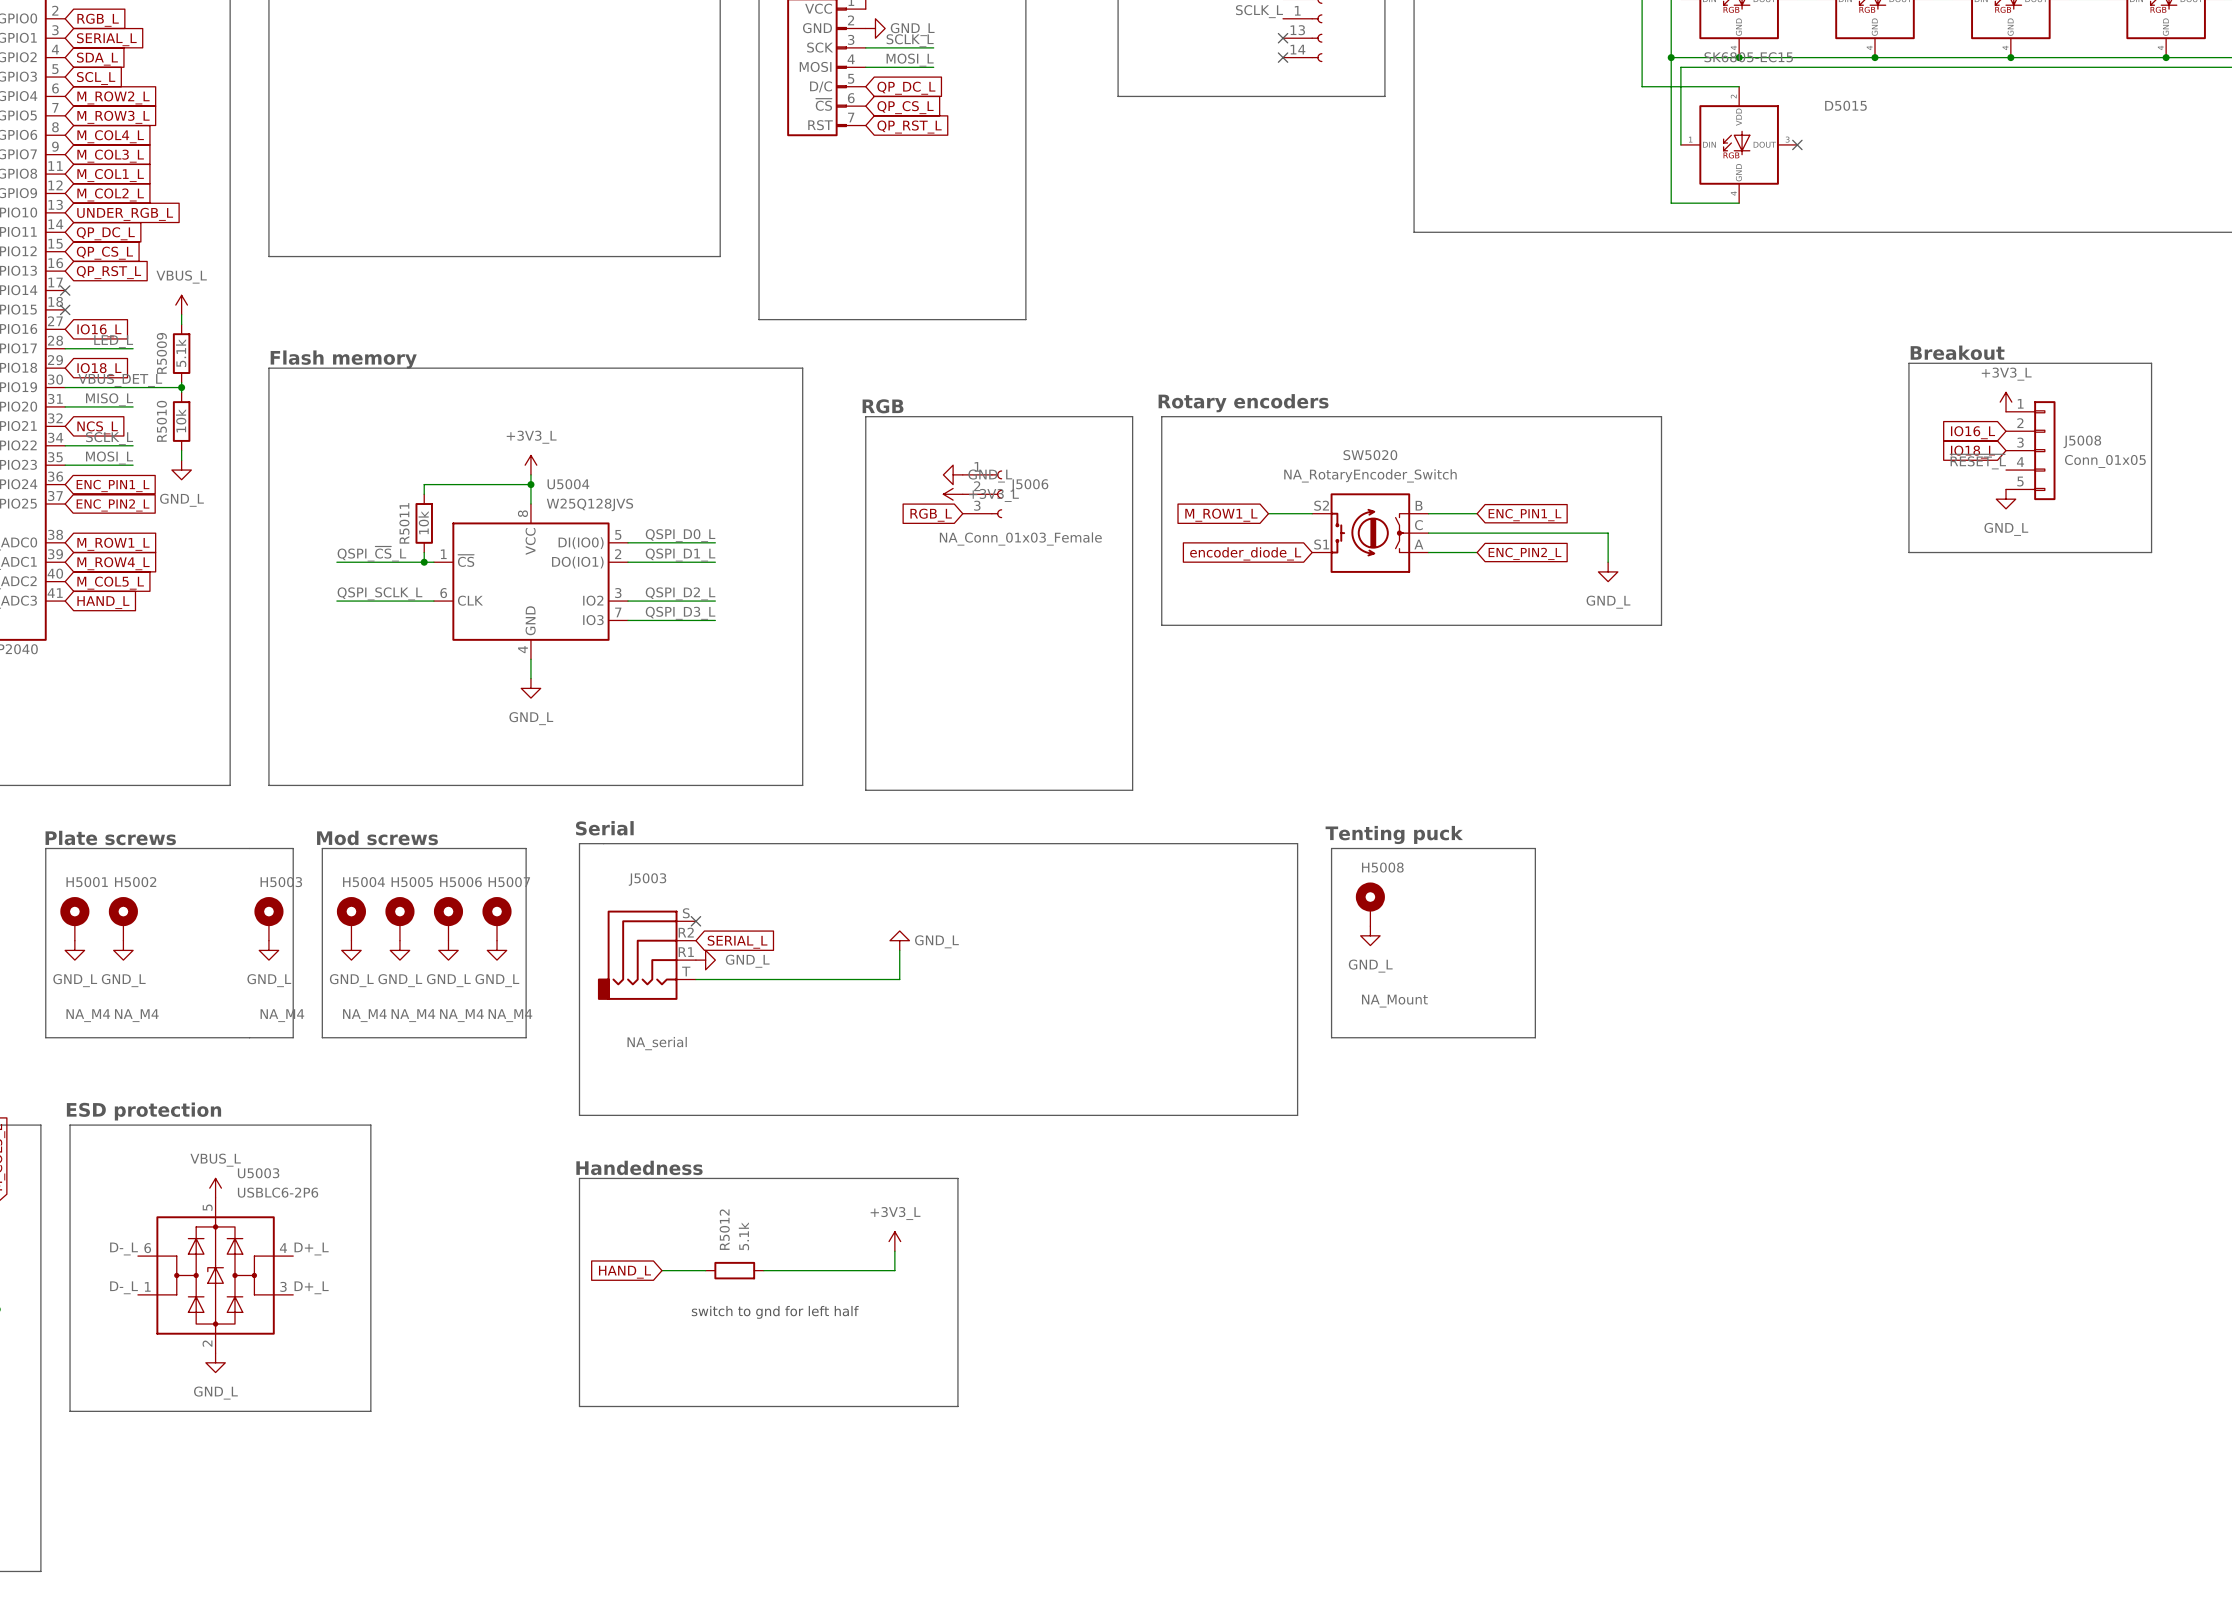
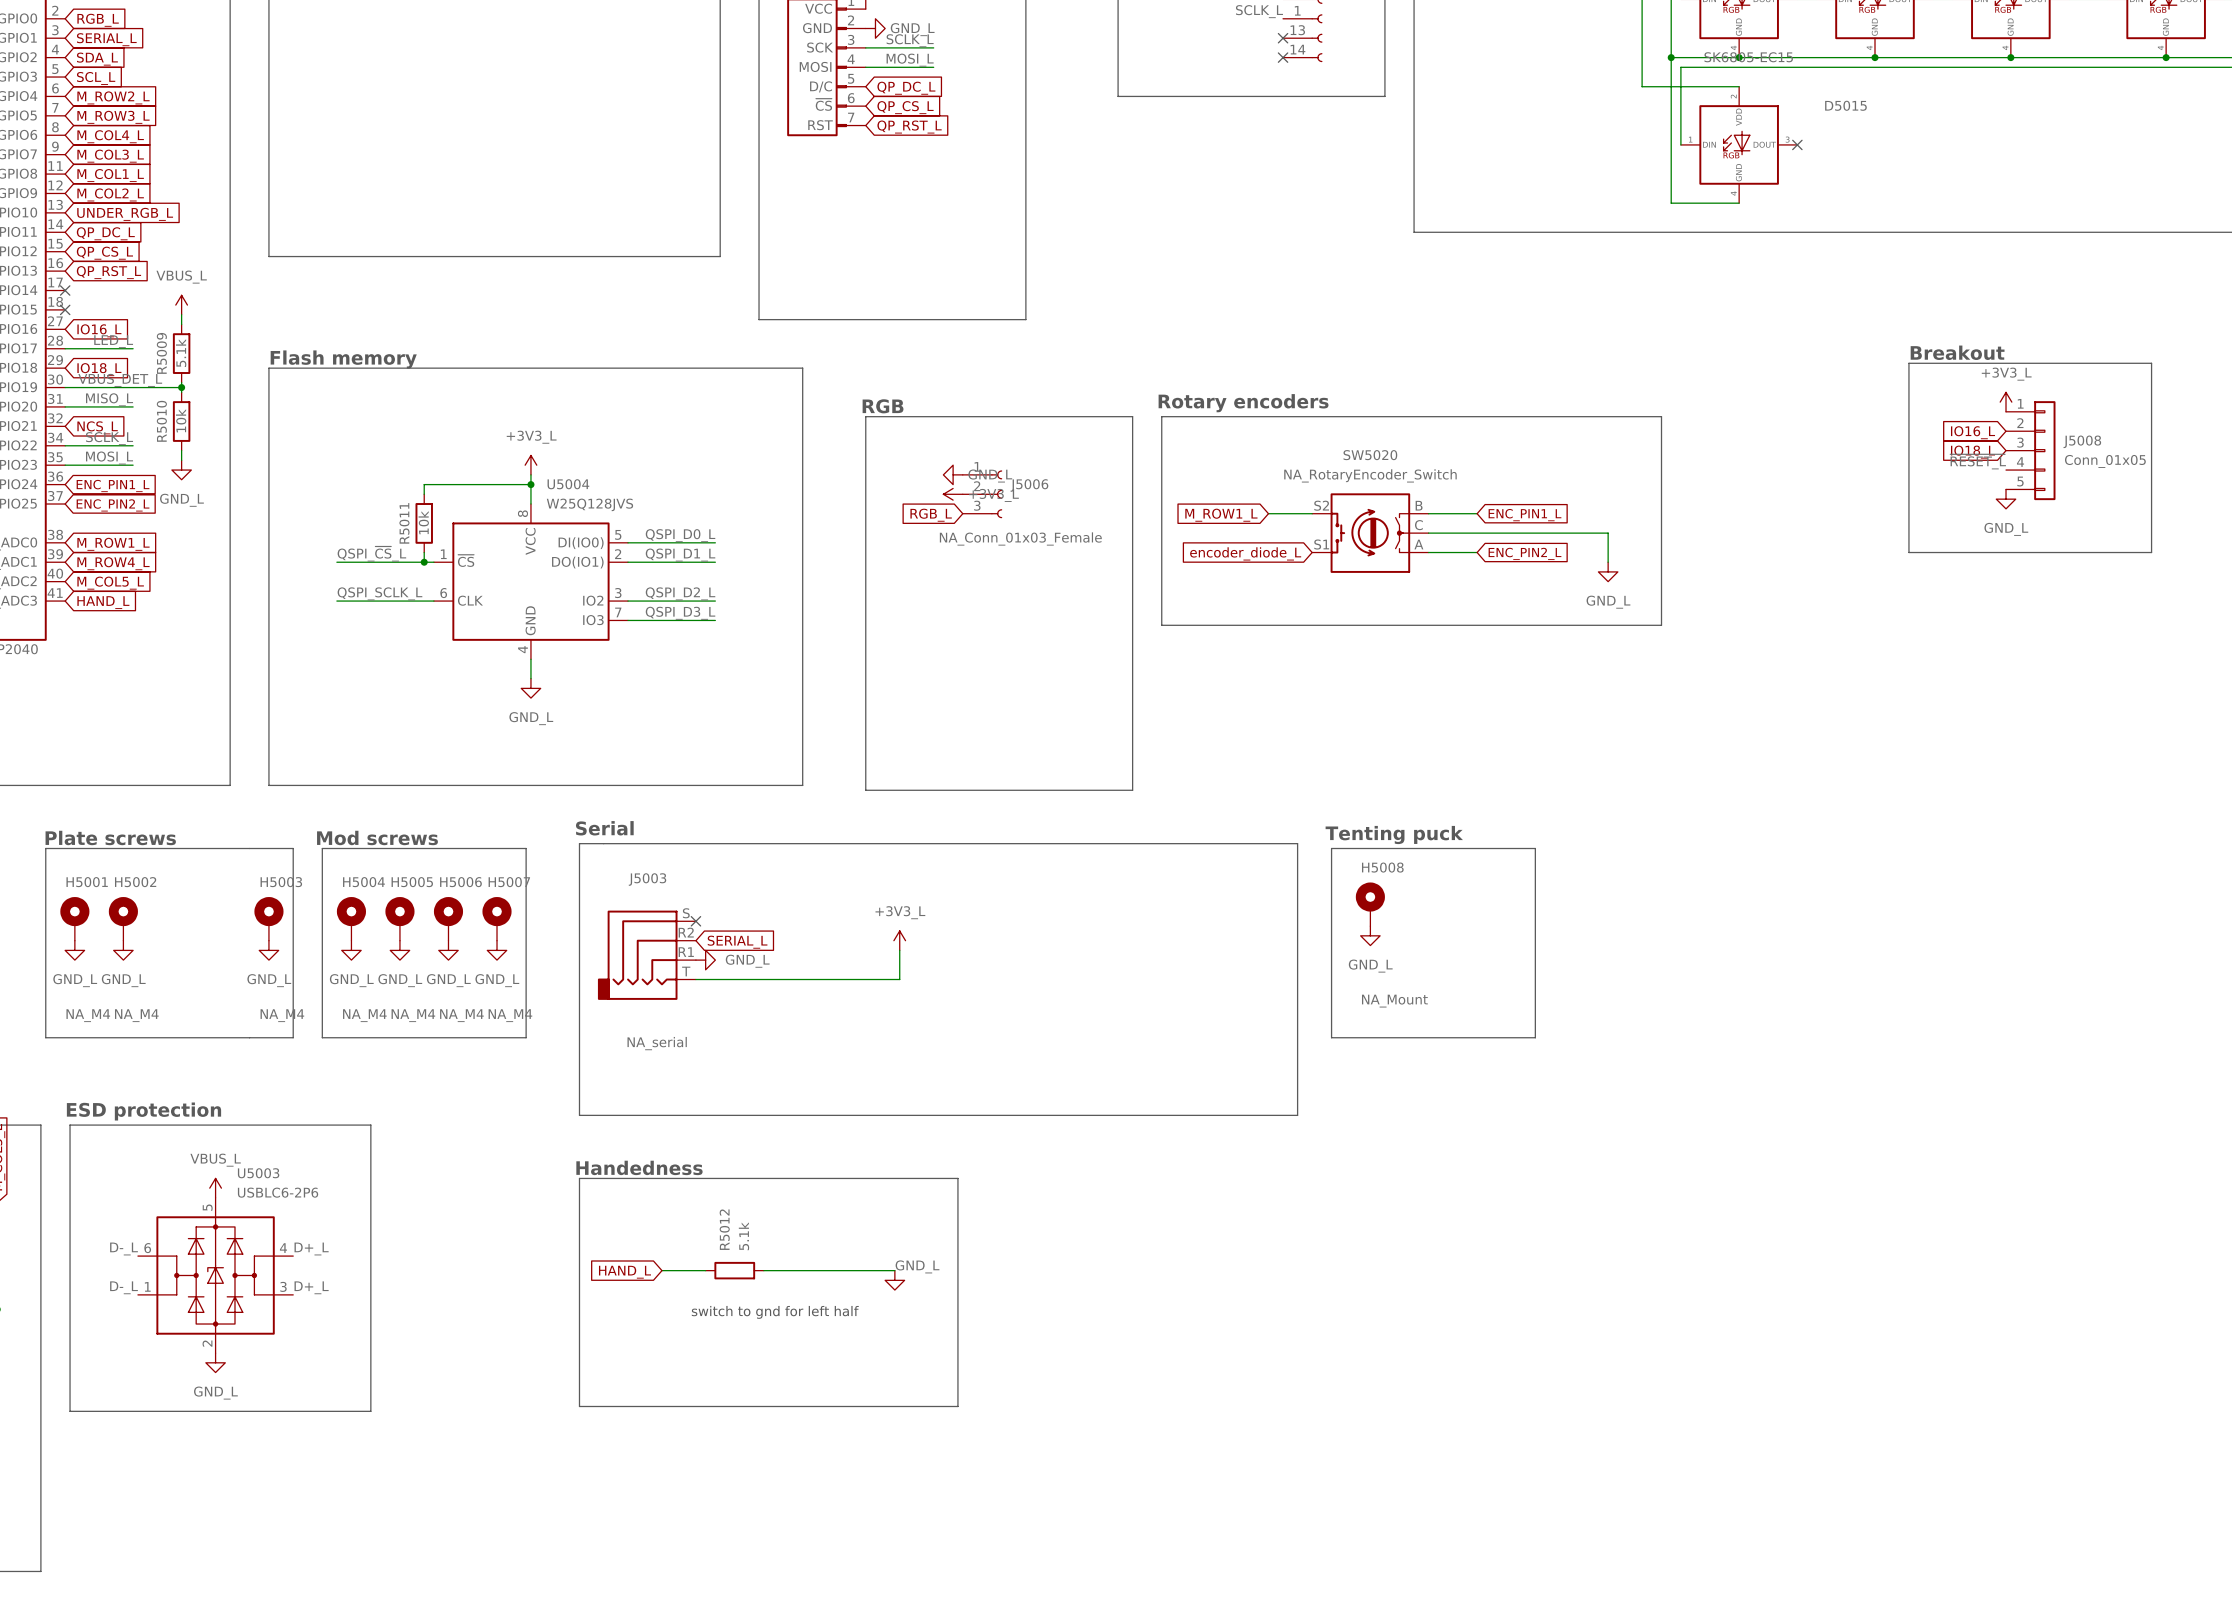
power symbol: GND_L (899, 940) -> +3V3_L (899, 940)
power symbol: +3V3_L (894, 1241) -> none
wire: (894, 1251) (894, 1270) -> none
power symbol: none -> GND_L (894, 1280)

